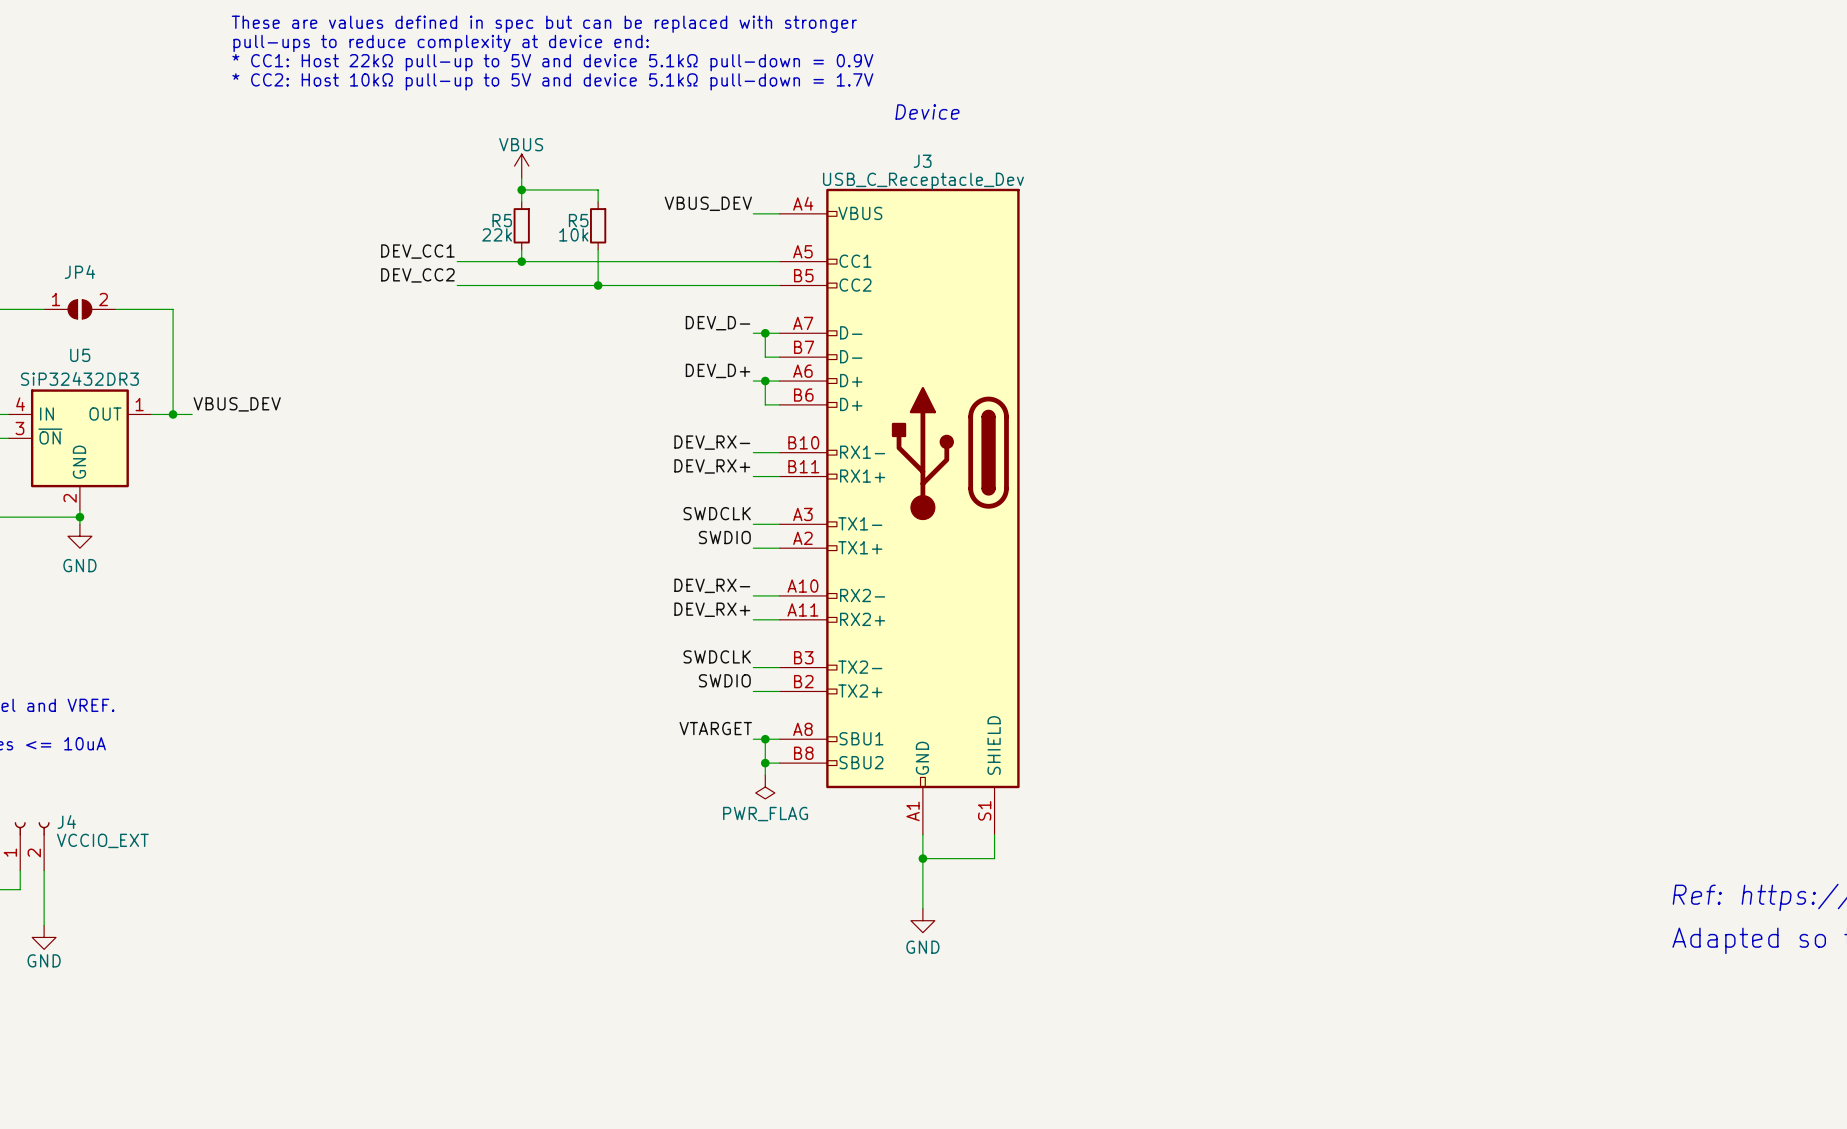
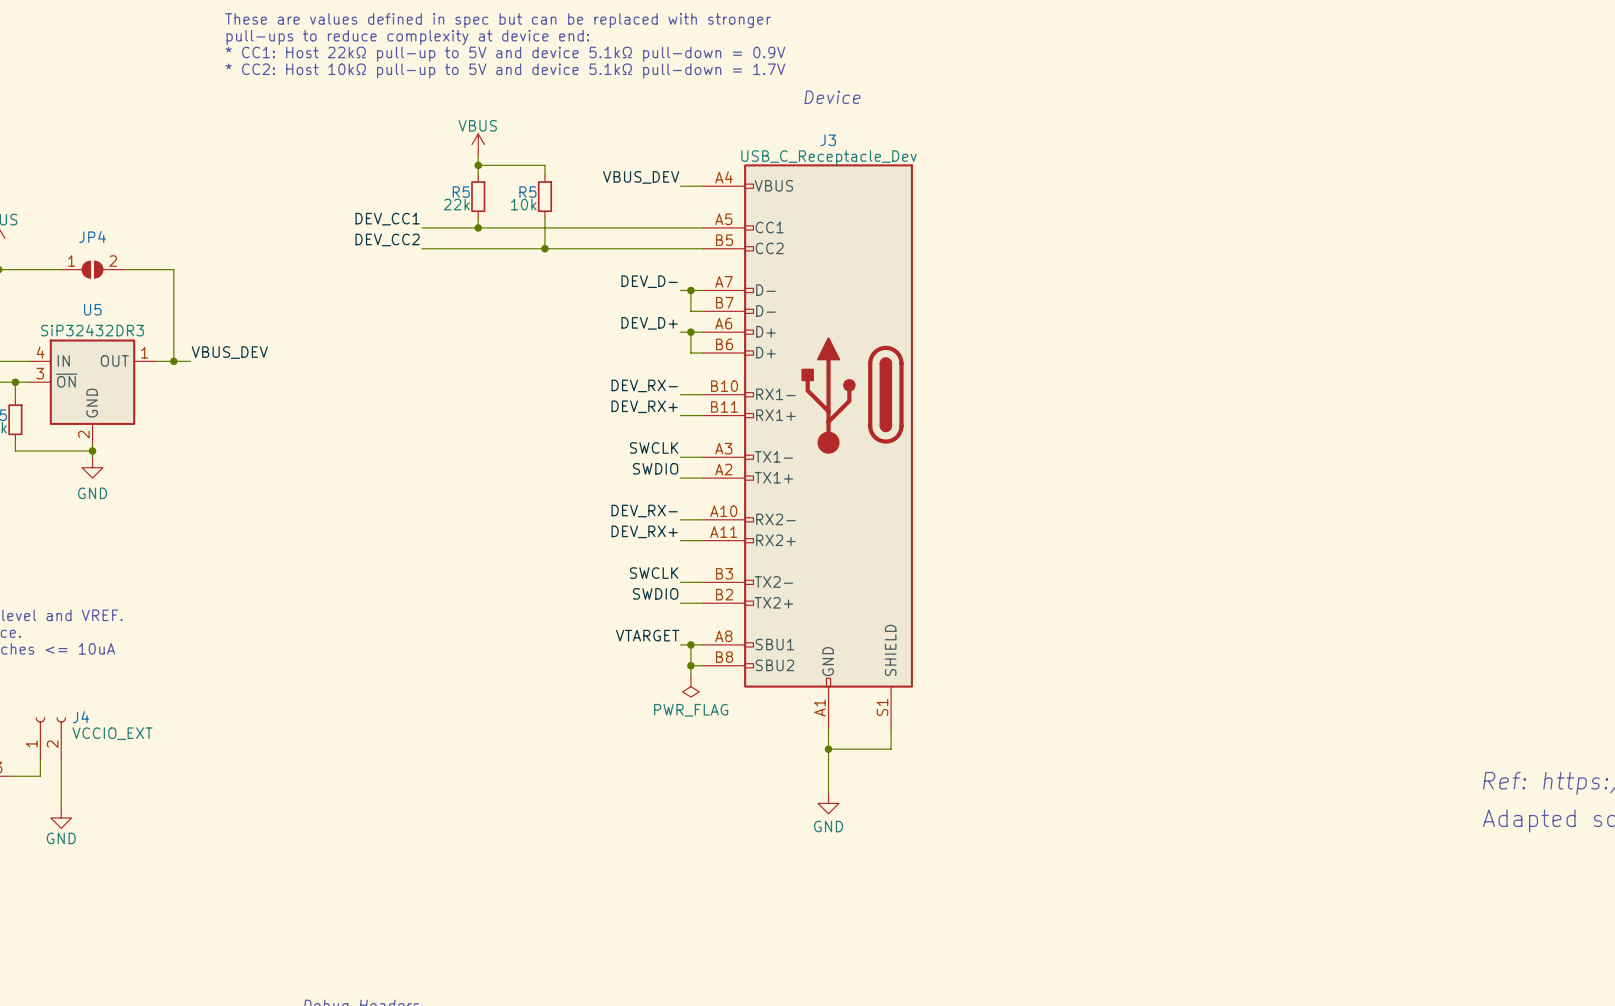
label: SWDCLK (717, 513) -> SWCLK (654, 447)
label: SWDCLK (717, 656) -> SWCLK (654, 573)

